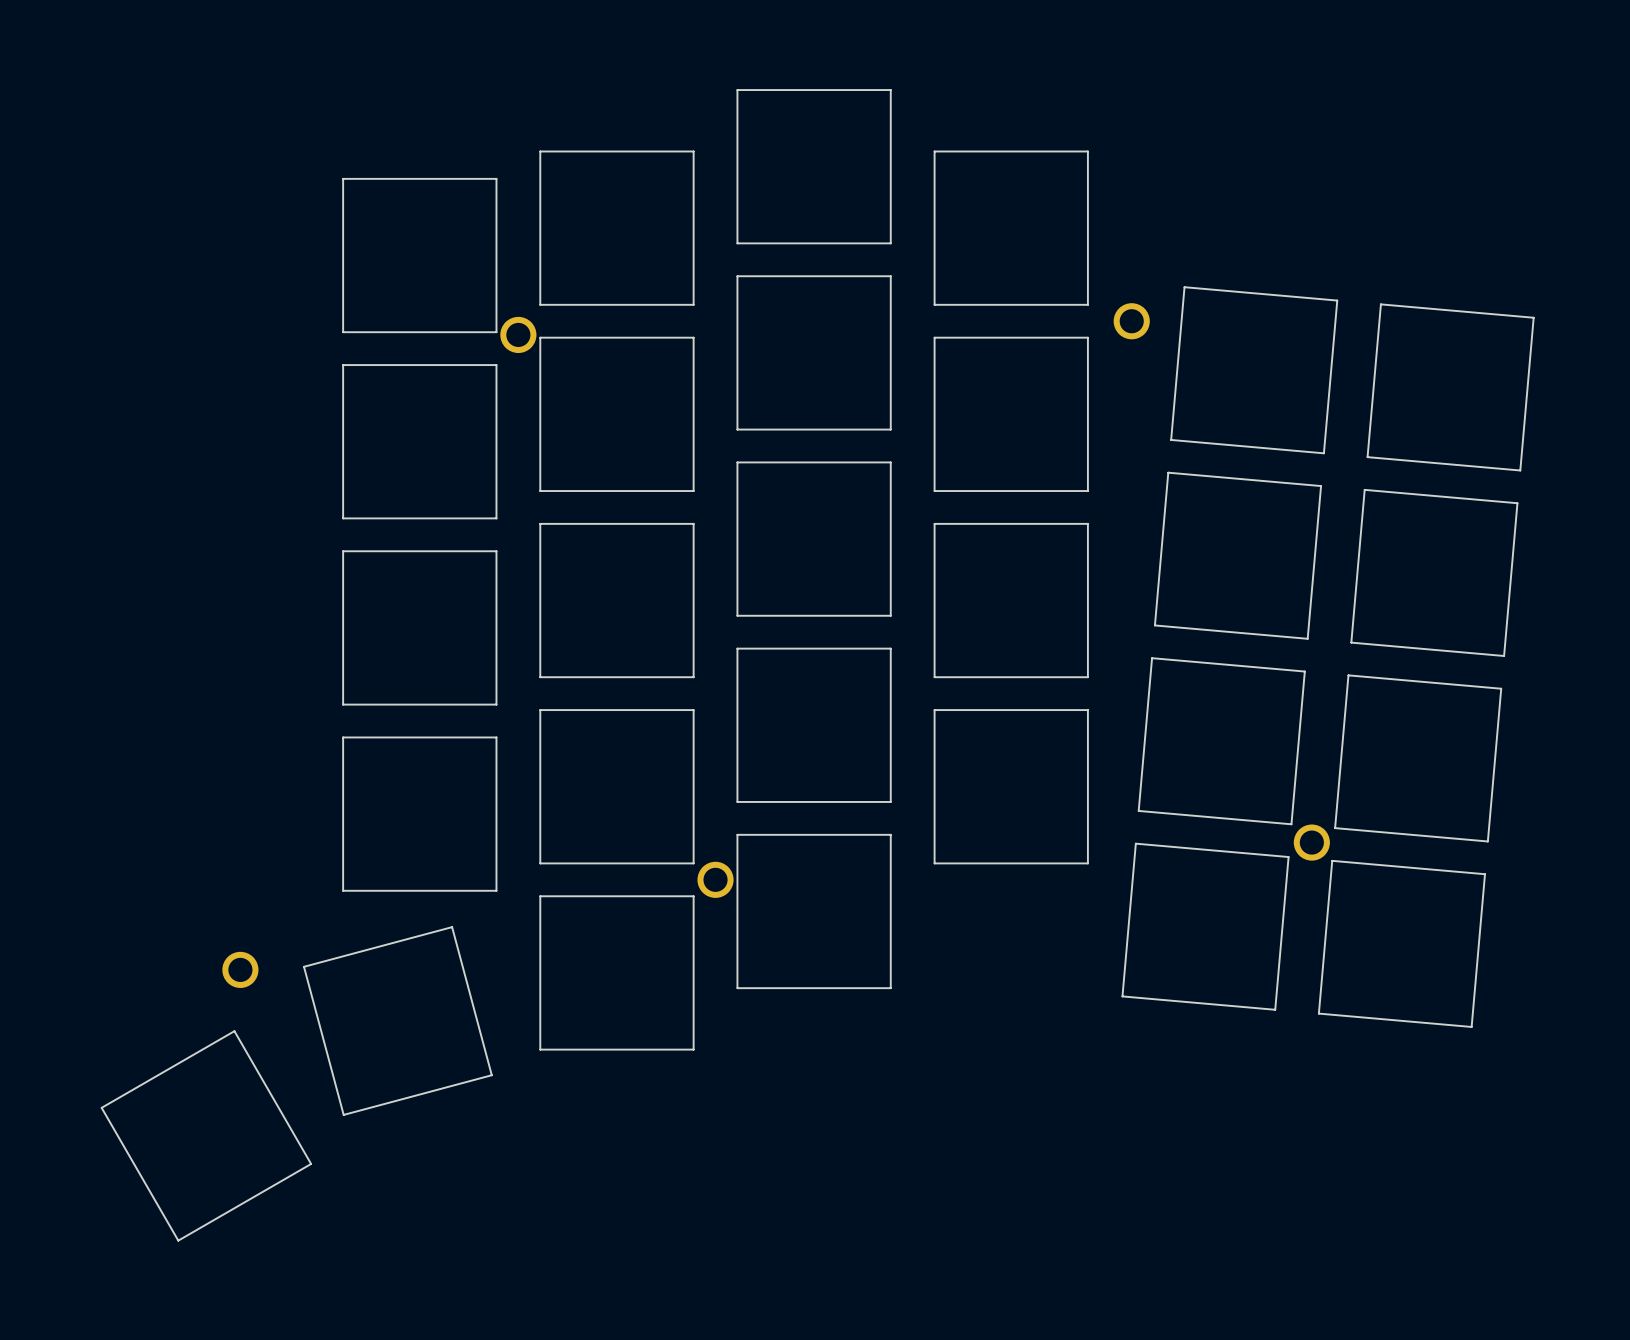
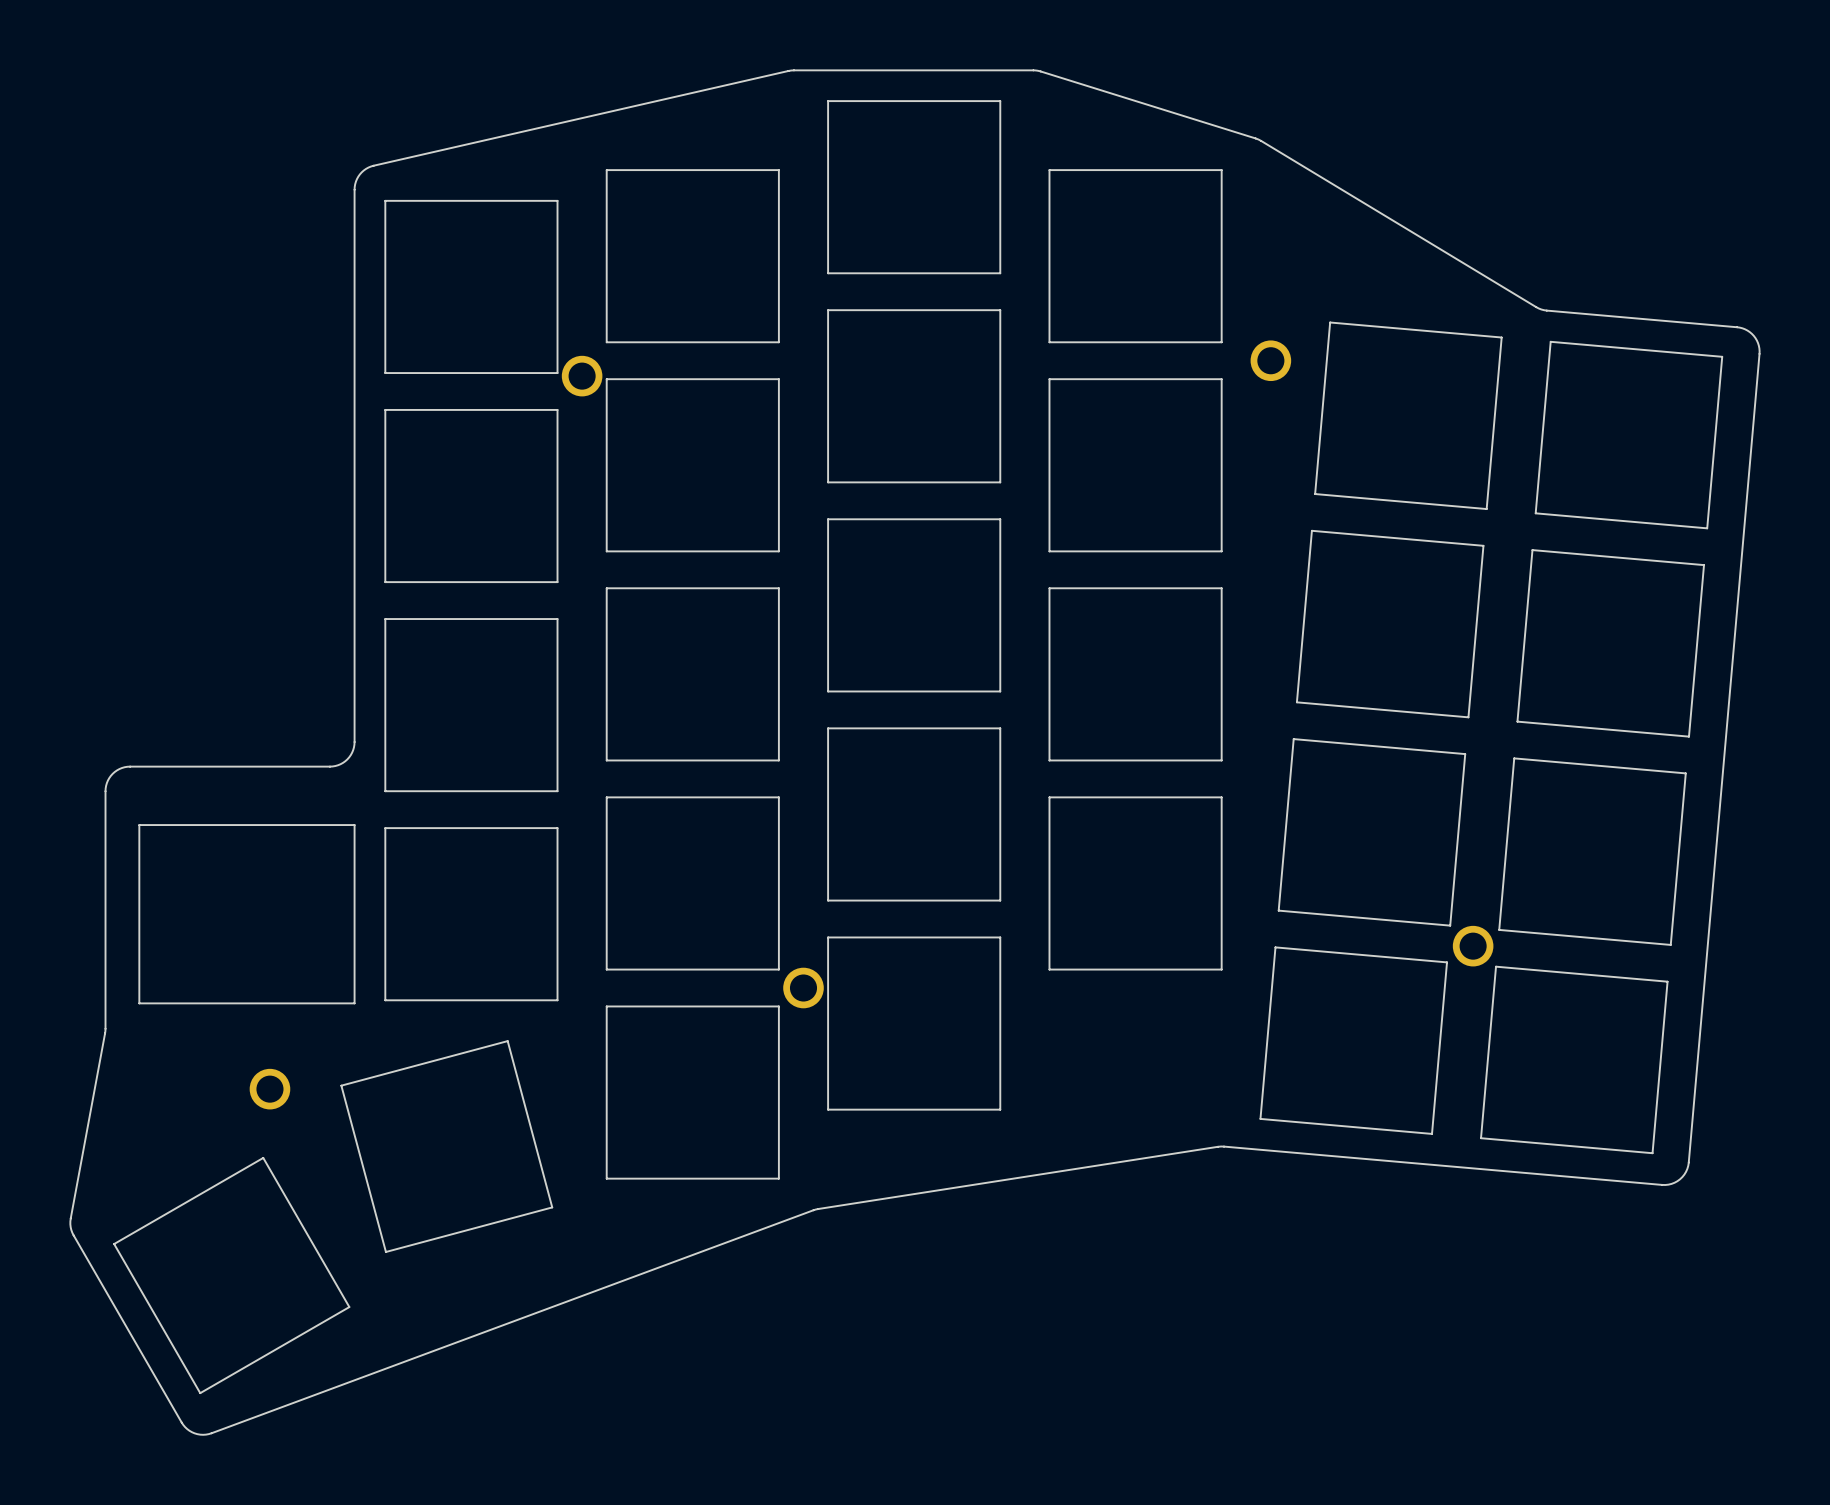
board edge: none -> (1033, 70) (791, 70) (373, 165) (363, 170) (358, 176) (354, 189) (353, 750) (345, 761) (332, 766) (127, 766) (112, 773) (105, 788) (105, 1031) (70, 1227) (181, 1422) (189, 1430) (200, 1434) (211, 1433) (818, 1209) (1221, 1146) (1662, 1184) (1674, 1182) (1684, 1174) (1688, 1162) (1759, 353) (1755, 338) (1747, 330) (1737, 327) (1541, 309) (1258, 139) (1033, 70)
board edge: none -> (354, 825) (354, 1003) (139, 1003) (139, 825) (354, 825)

